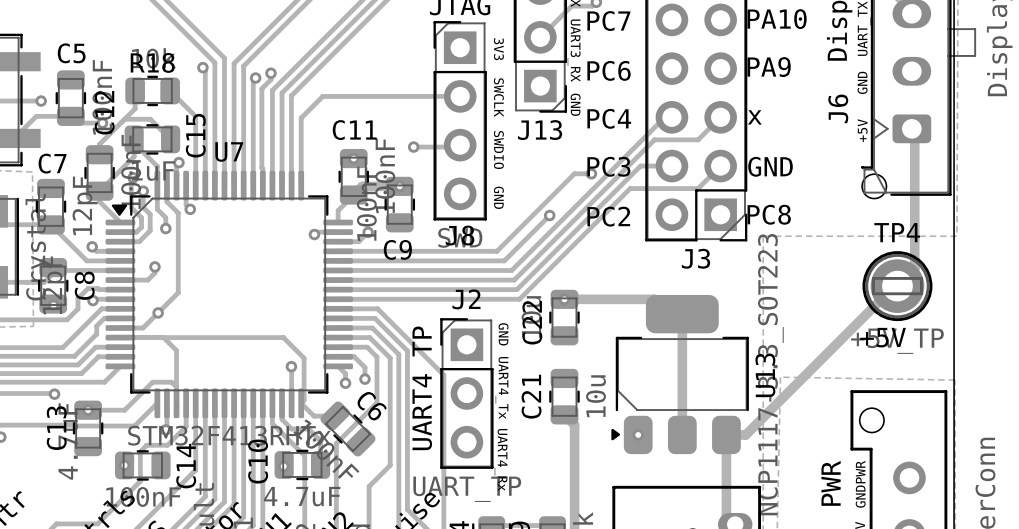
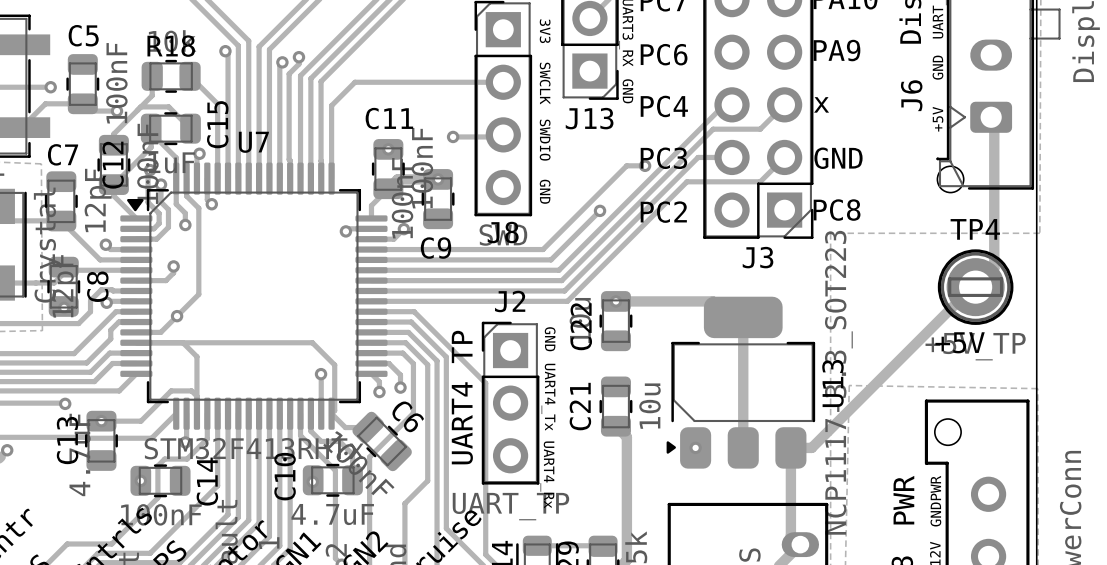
C12 name position: C12 (104, 112) -> C12 (113, 165)

